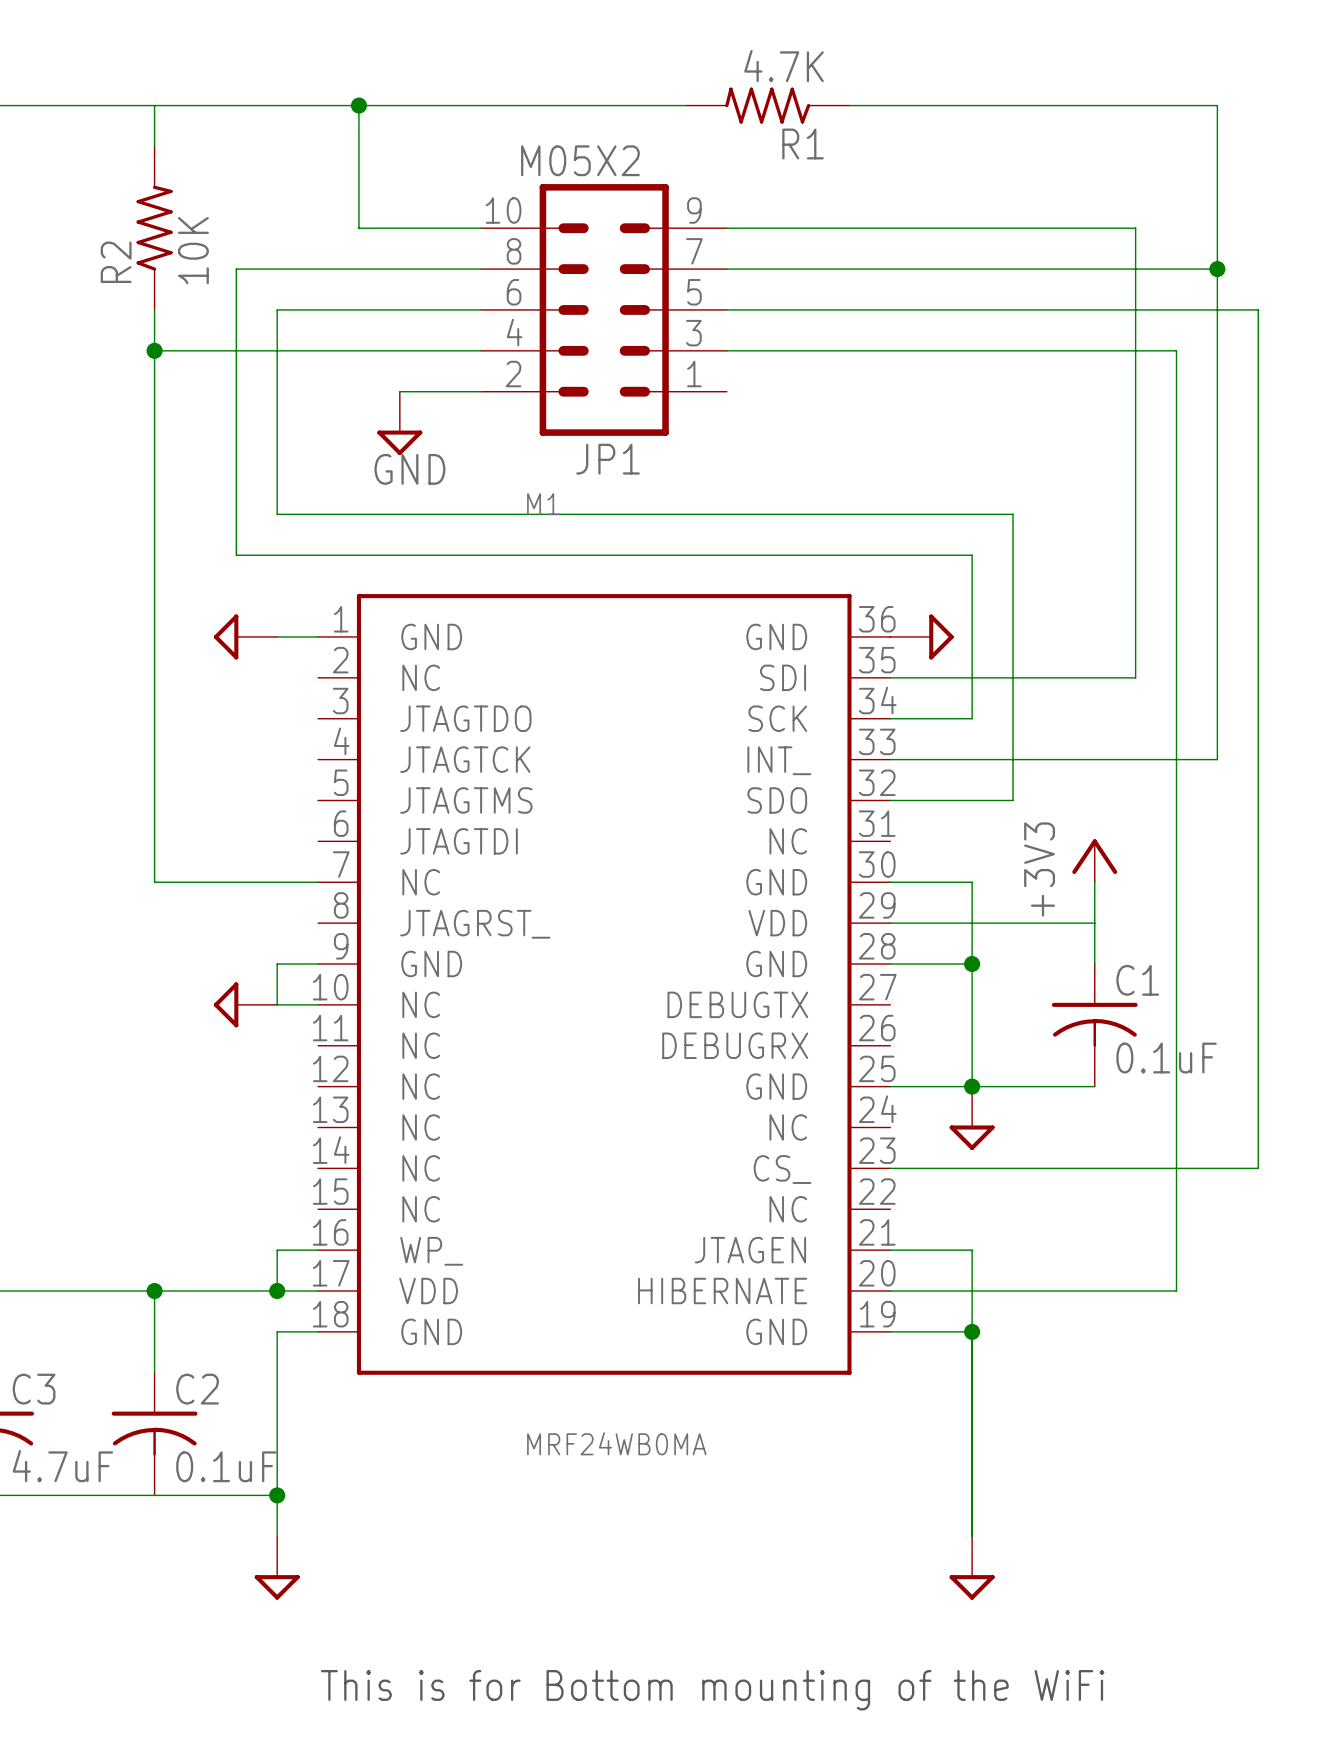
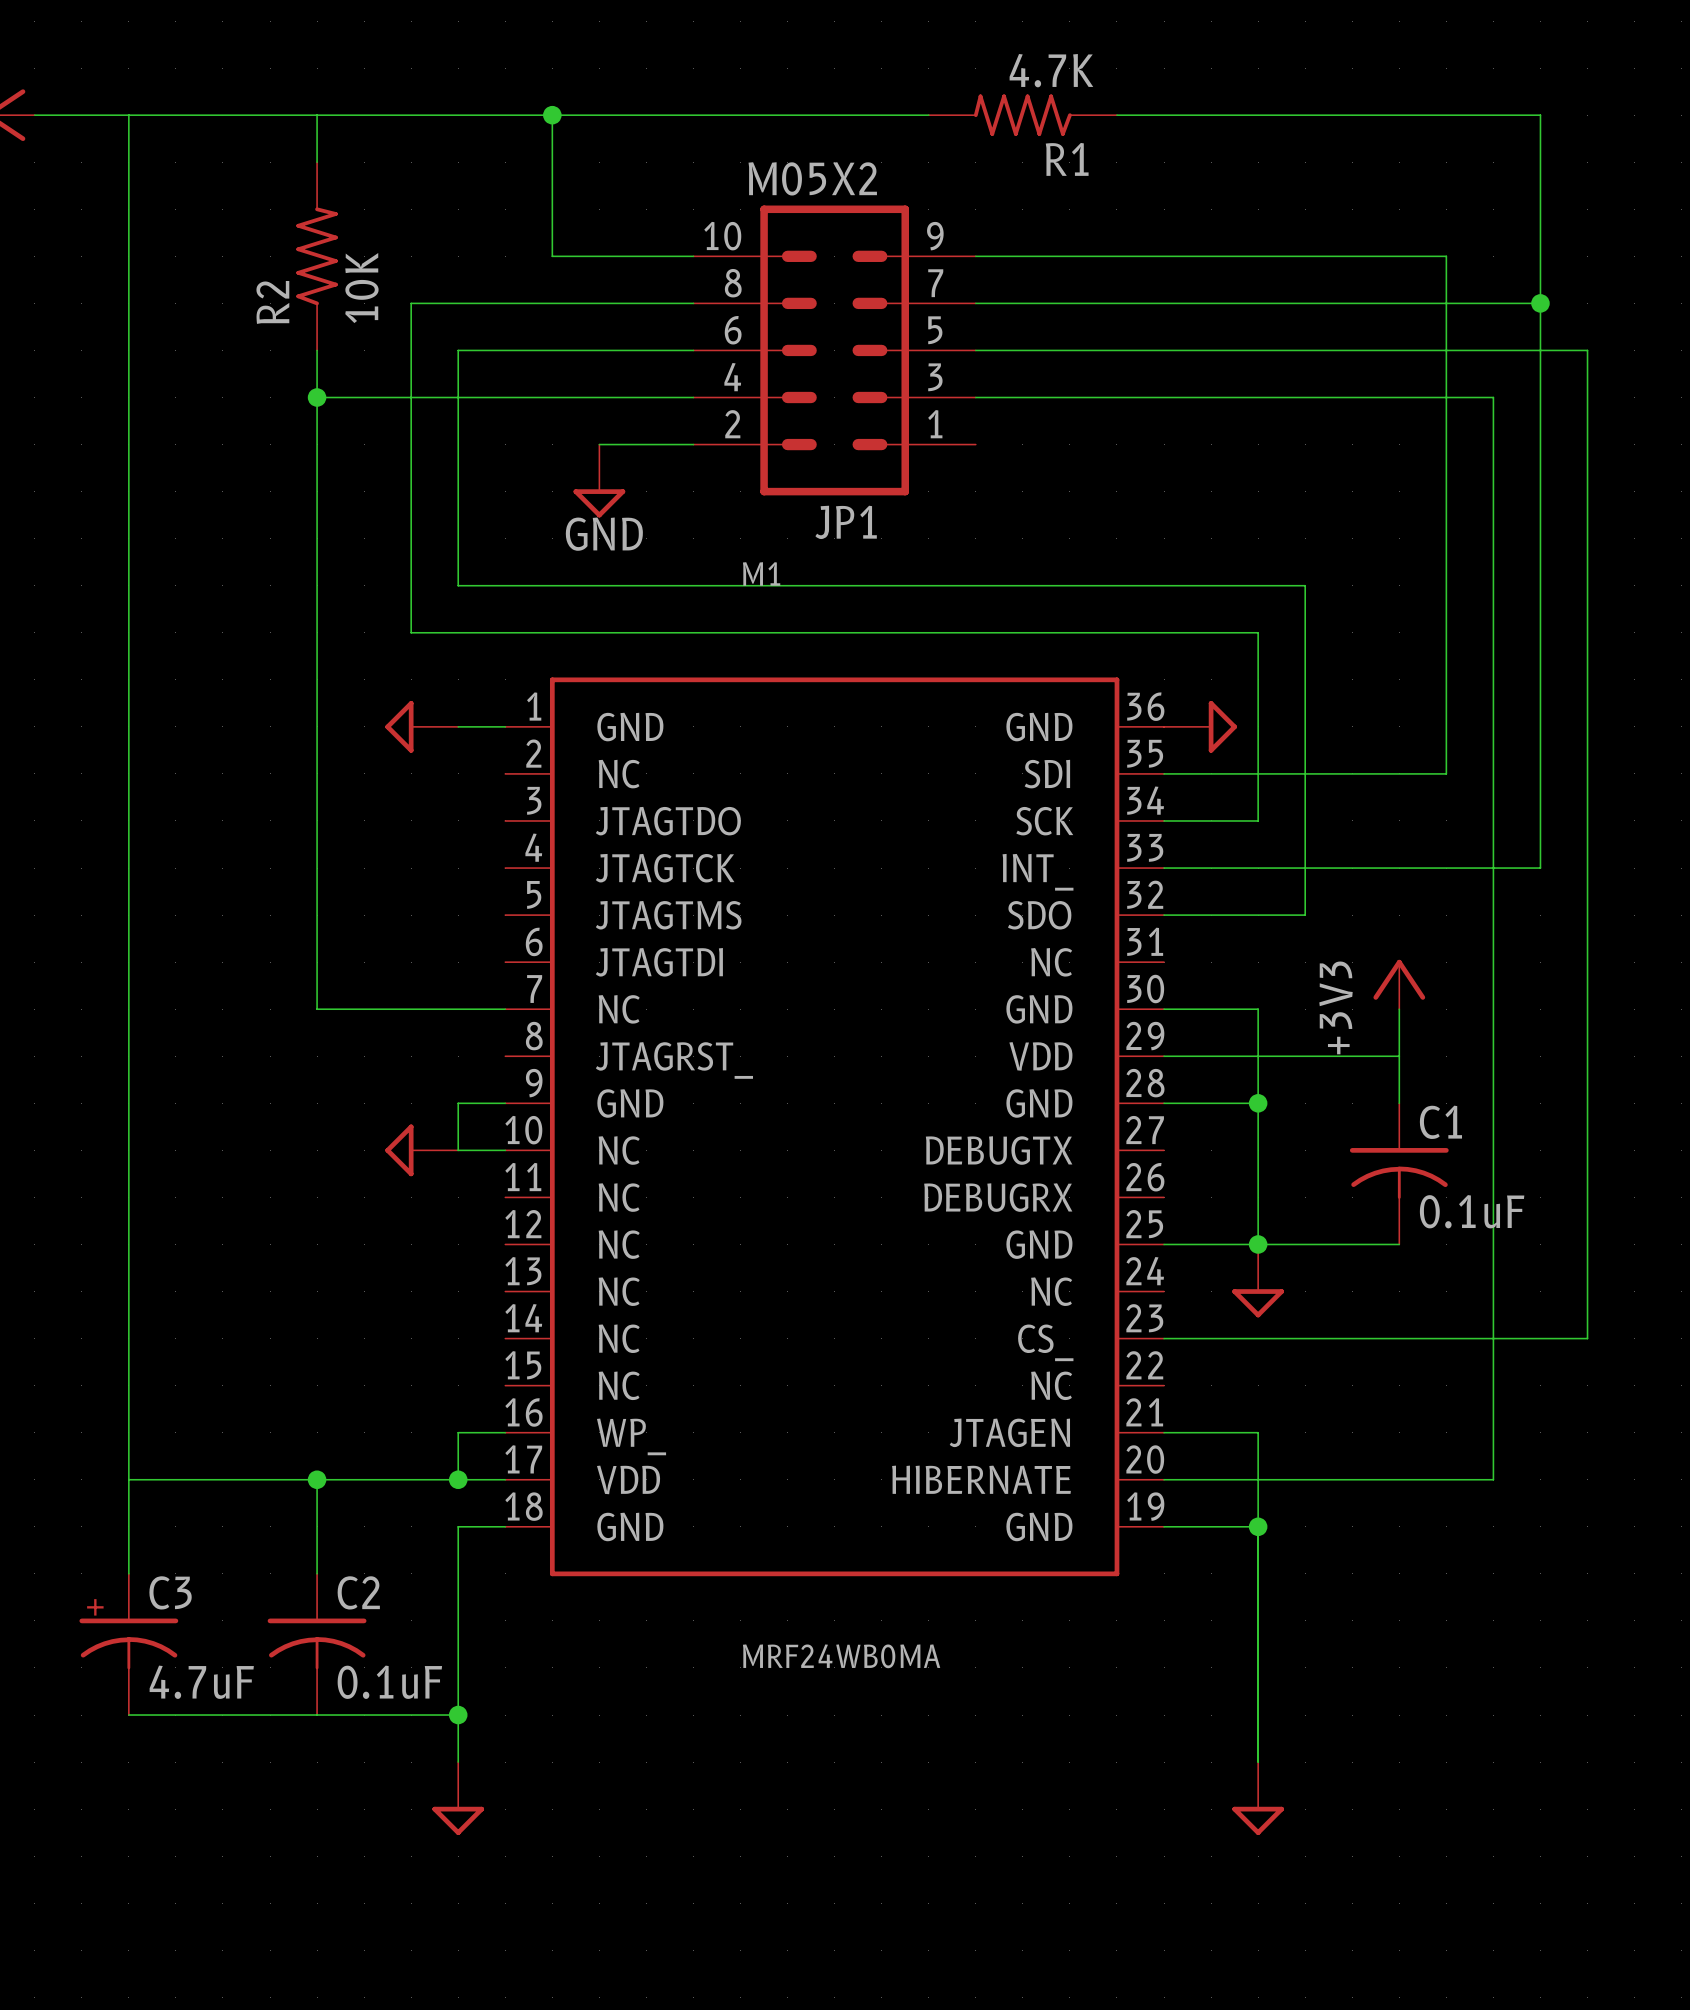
text: This is for Bottom mounting of the WiFi (712, 1690) -> none

